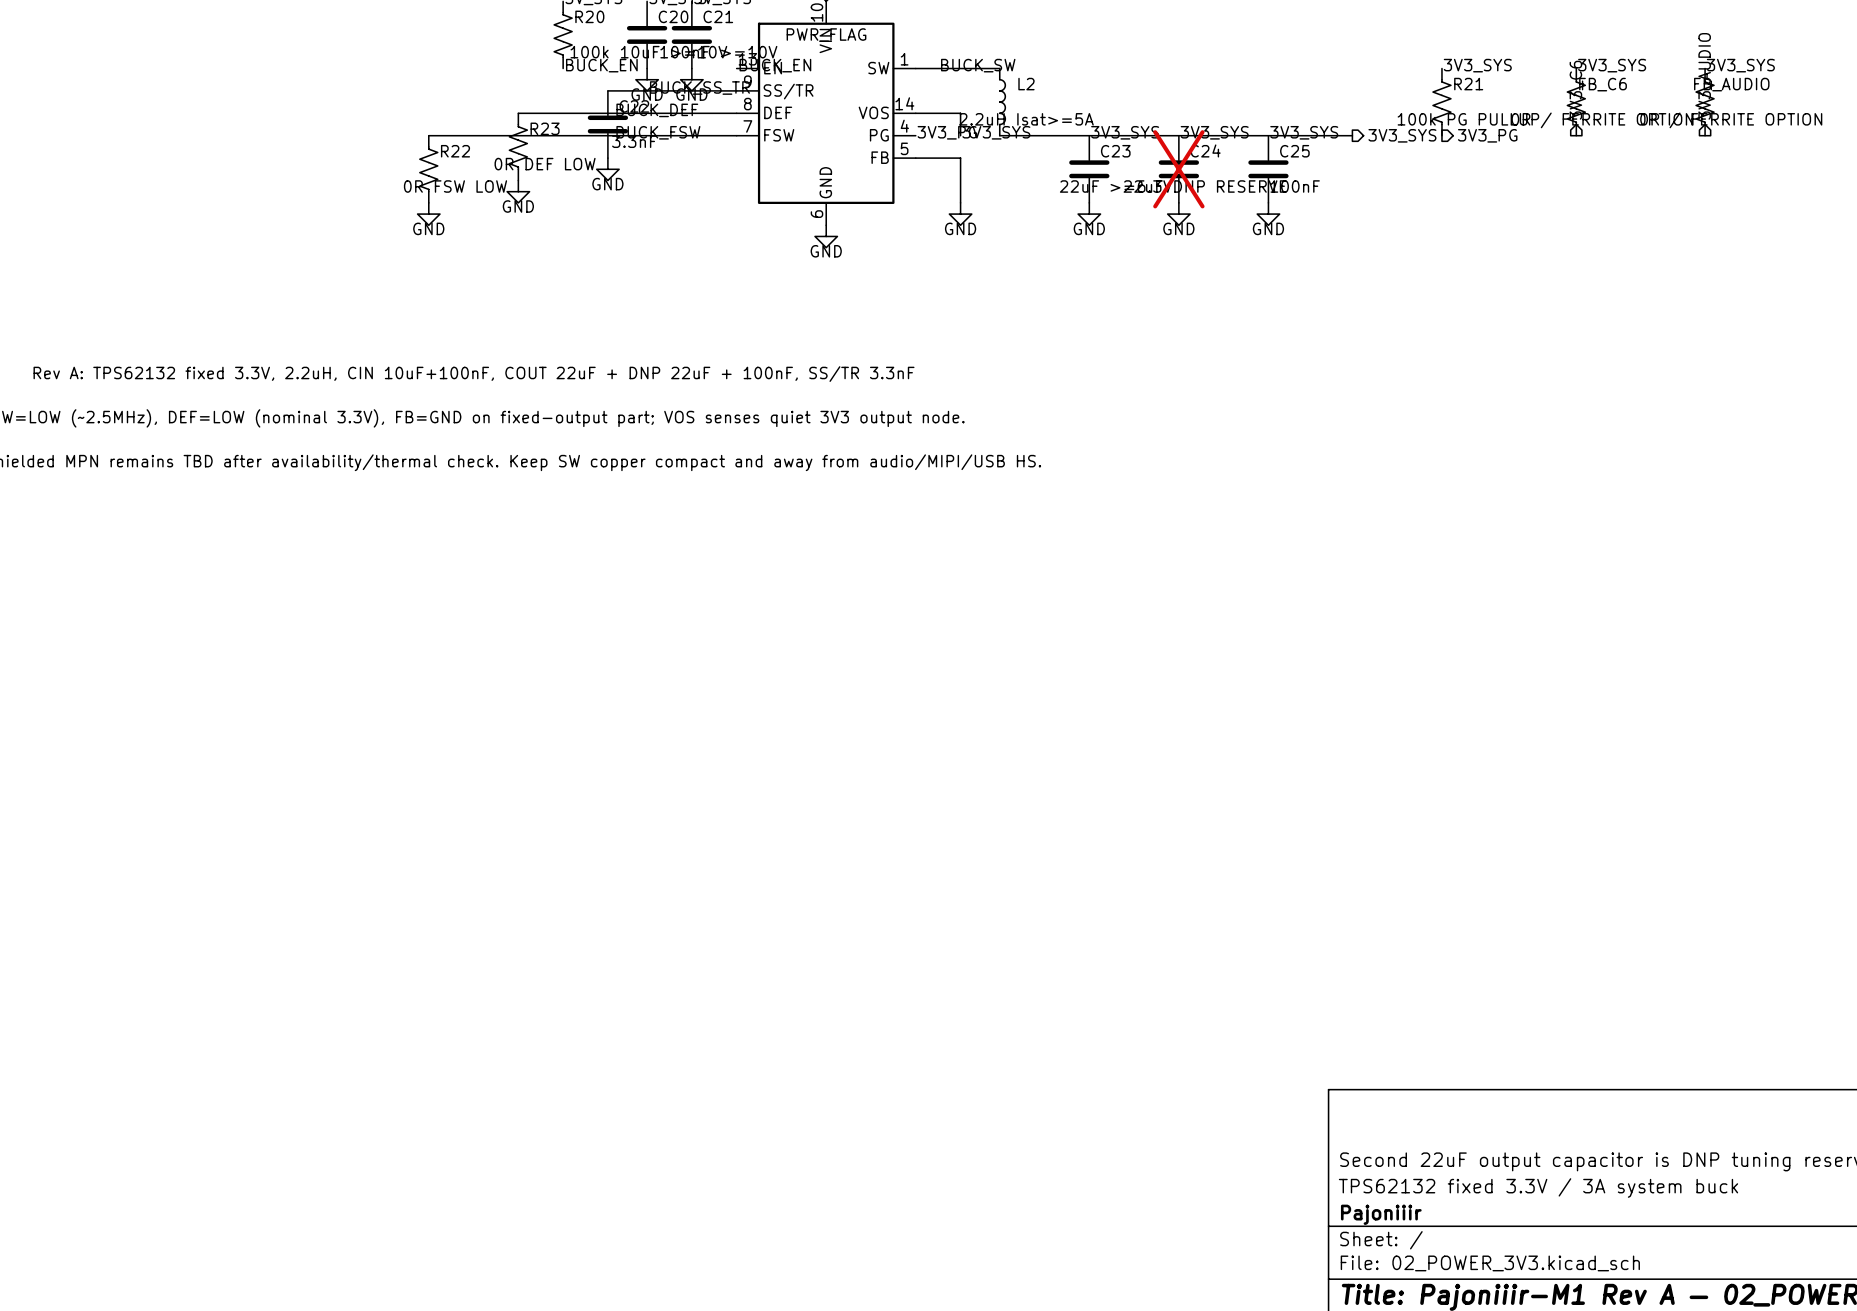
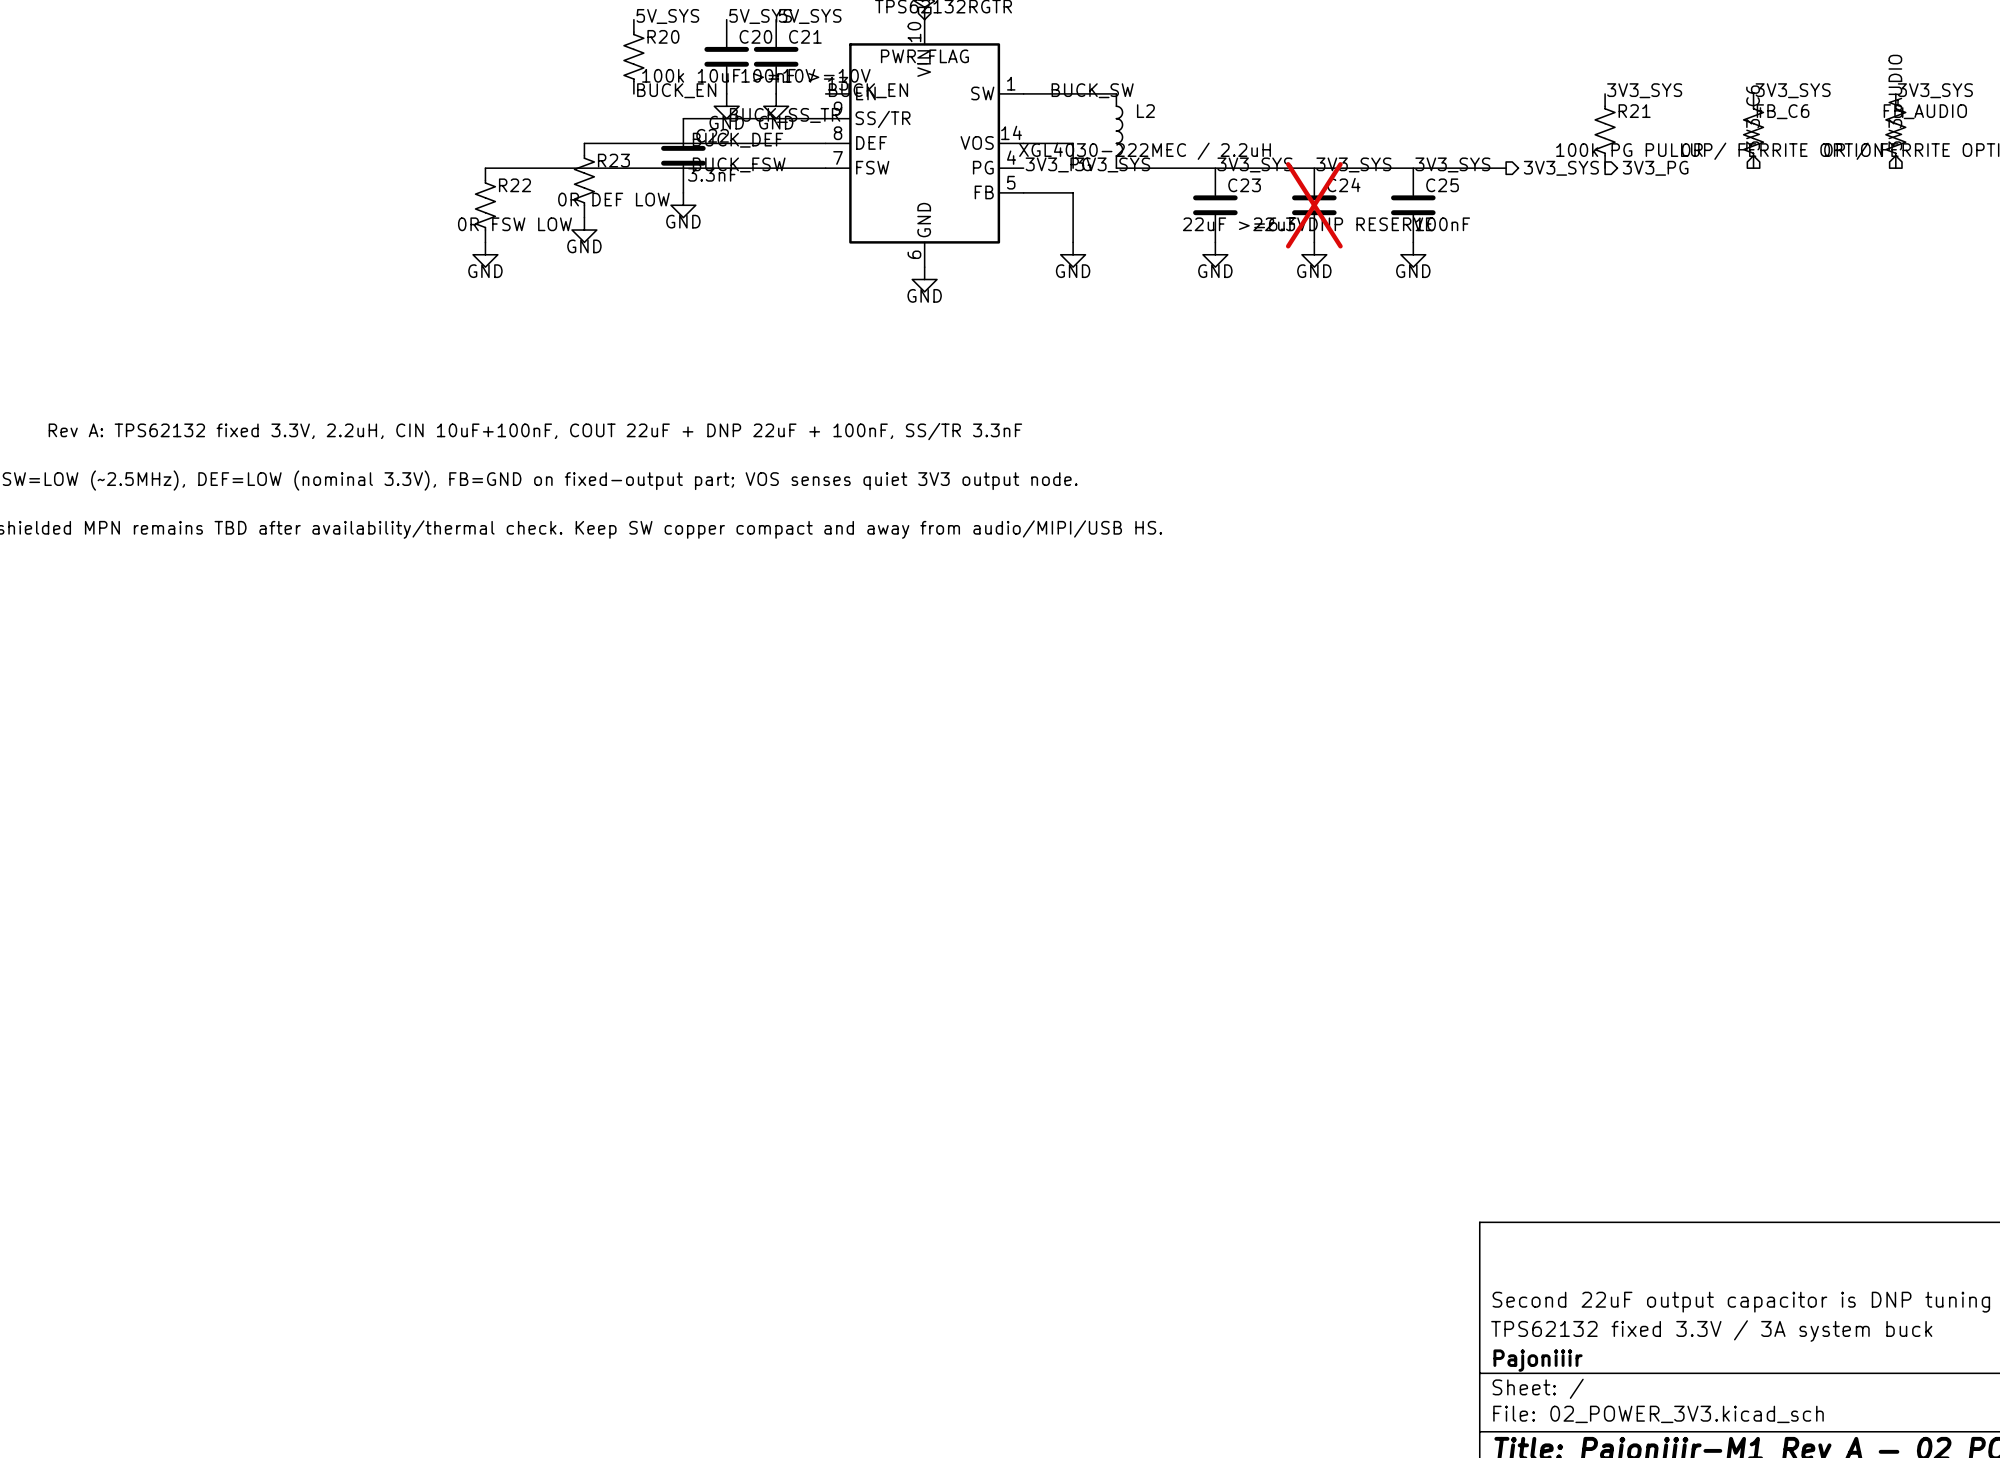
L2 value: 2.2uH Isat>=5A (1026, 119) -> XGL4030-222MEC / 2.2uH (1145, 151)

